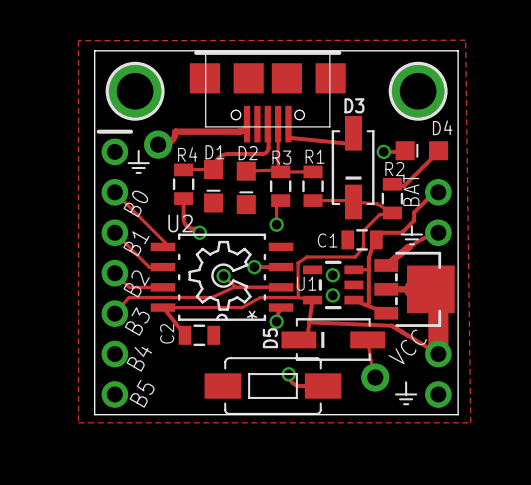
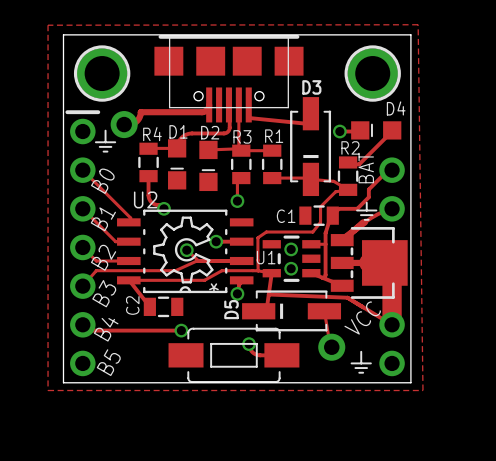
track: none -> (82, 324) (82, 330) (181, 330)
via: none -> (181, 330)

